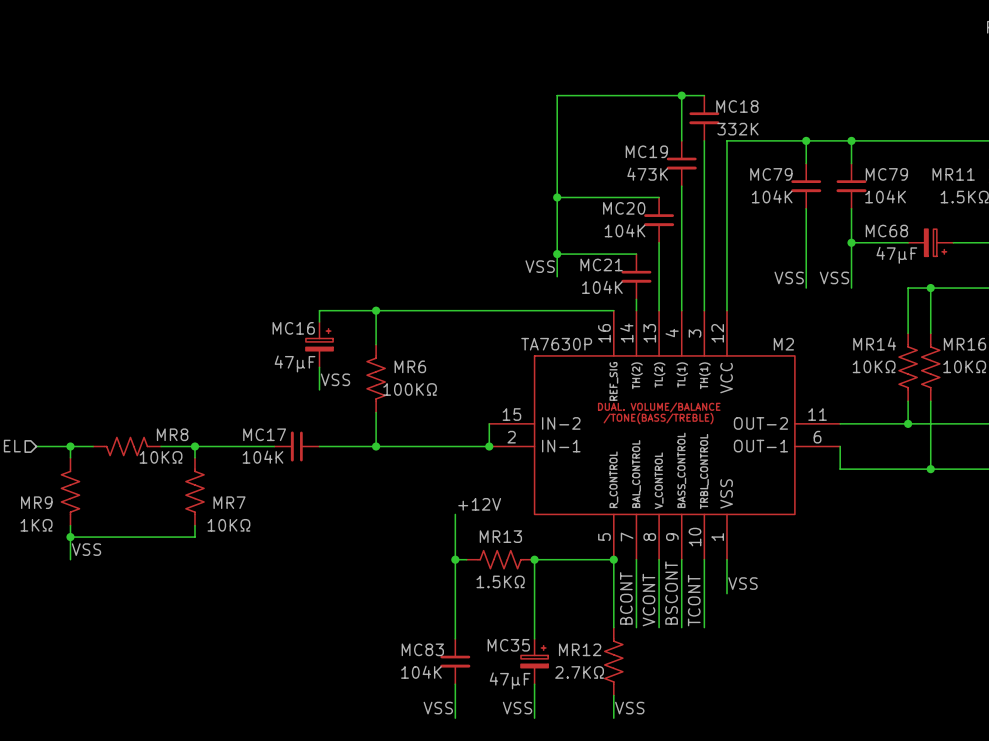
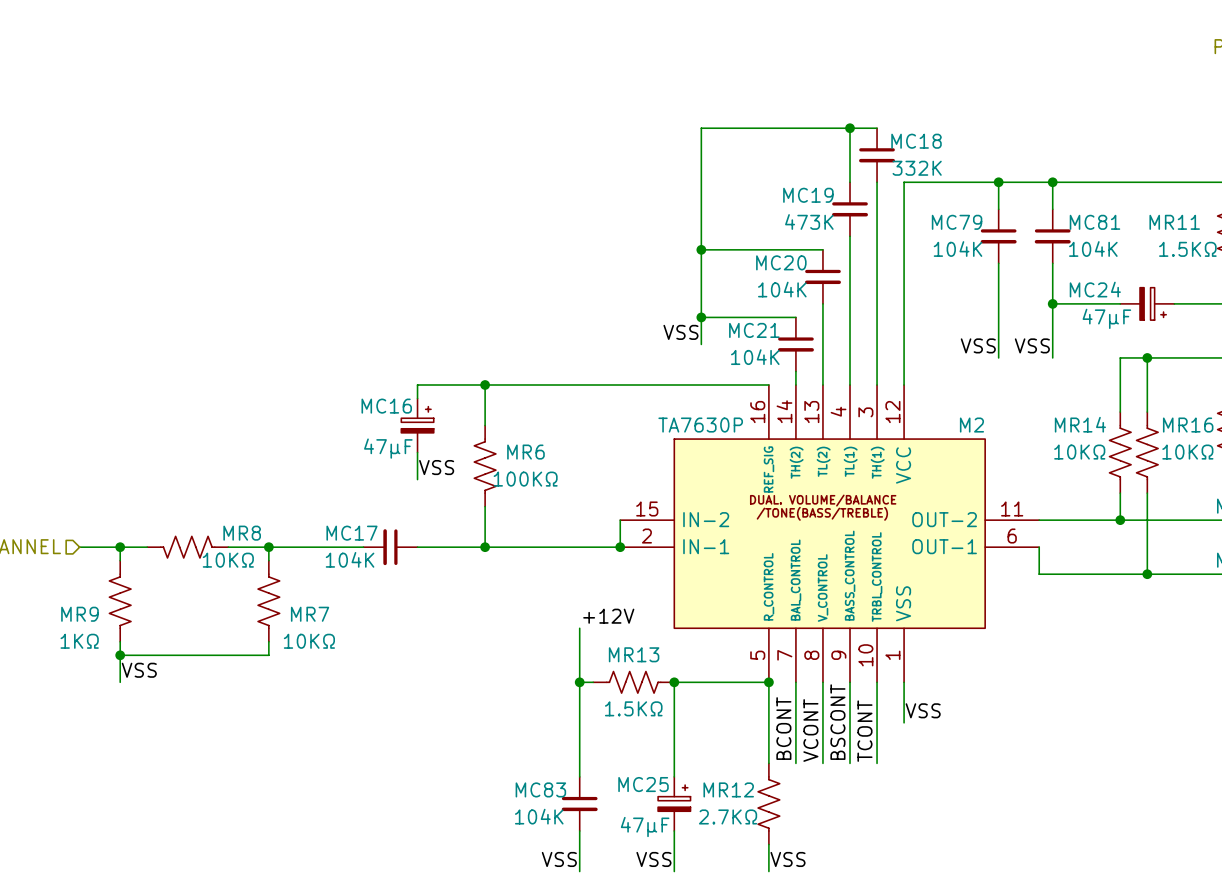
MC79 name: MC79 (886, 174) -> MC81 (1094, 222)
MC68 name: MC68 (886, 231) -> MC24 (1095, 289)
MC35 name: MC35 (508, 645) -> MC25 (643, 784)

